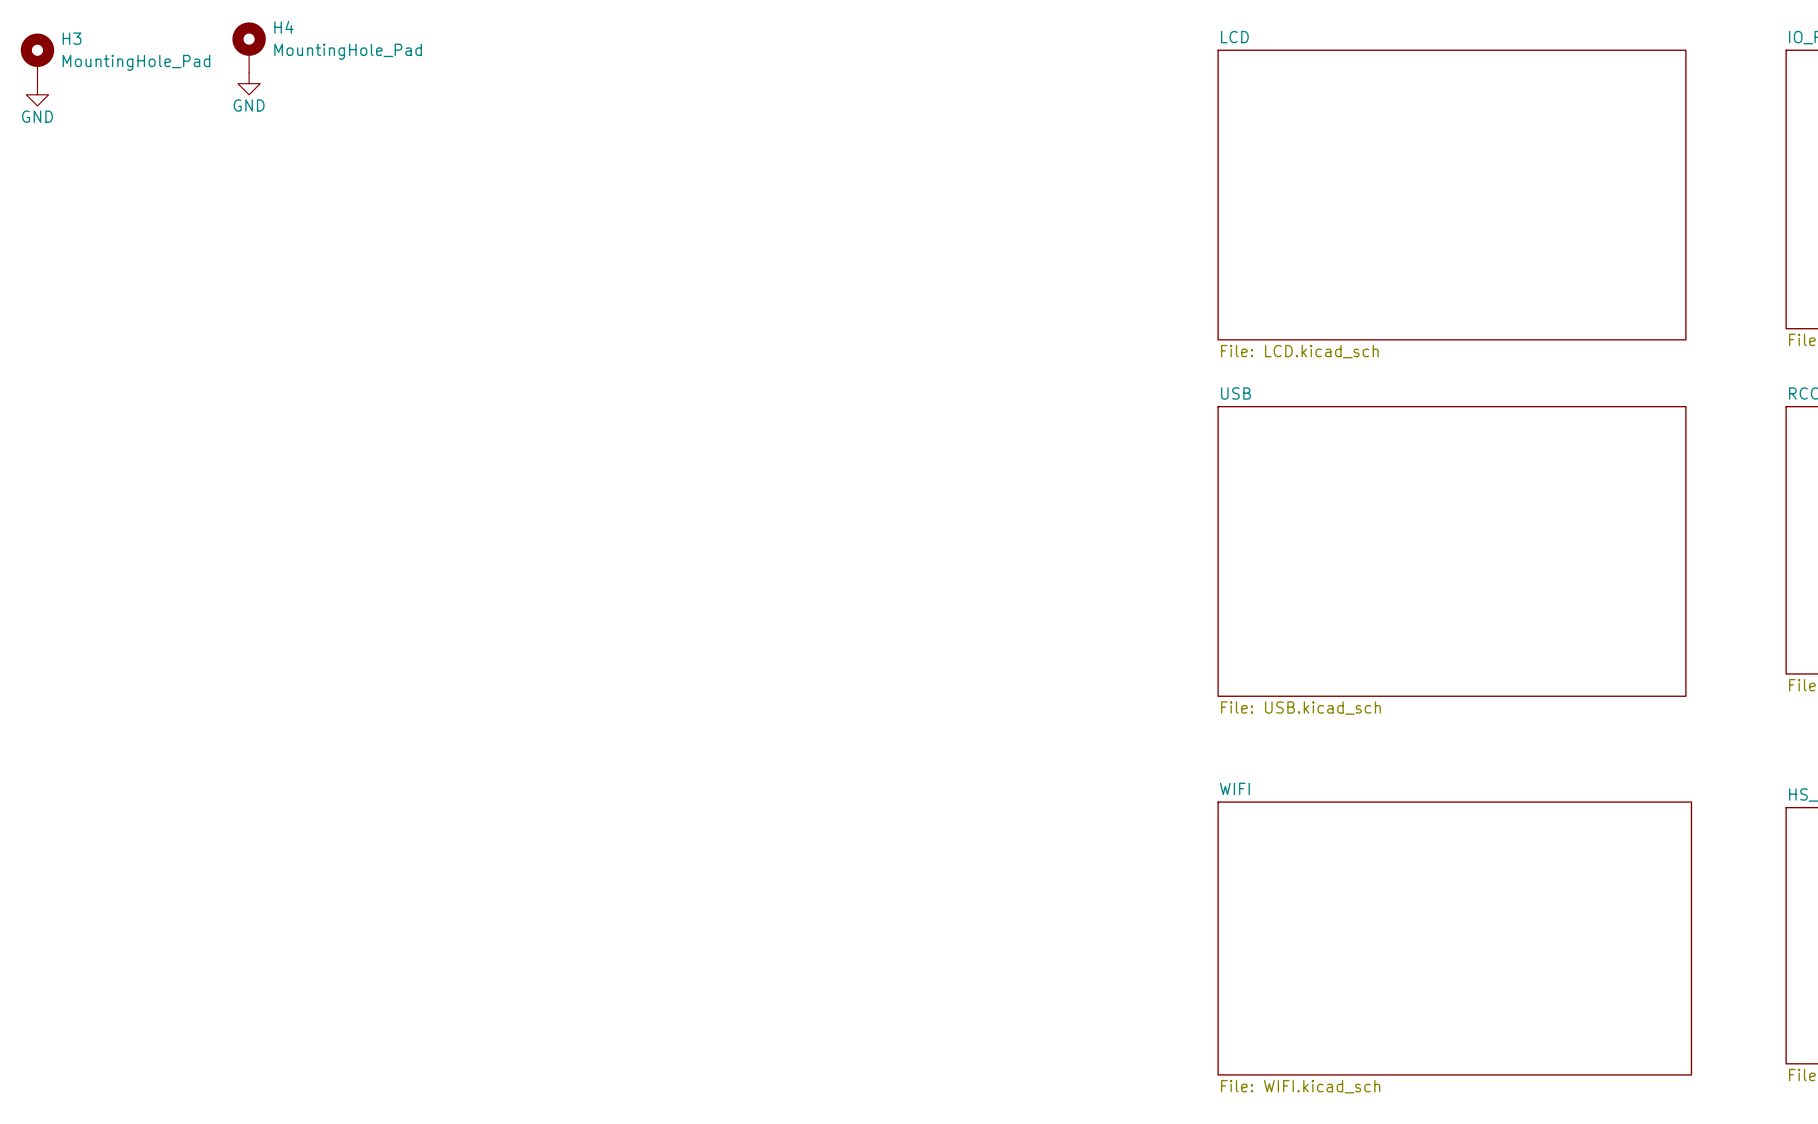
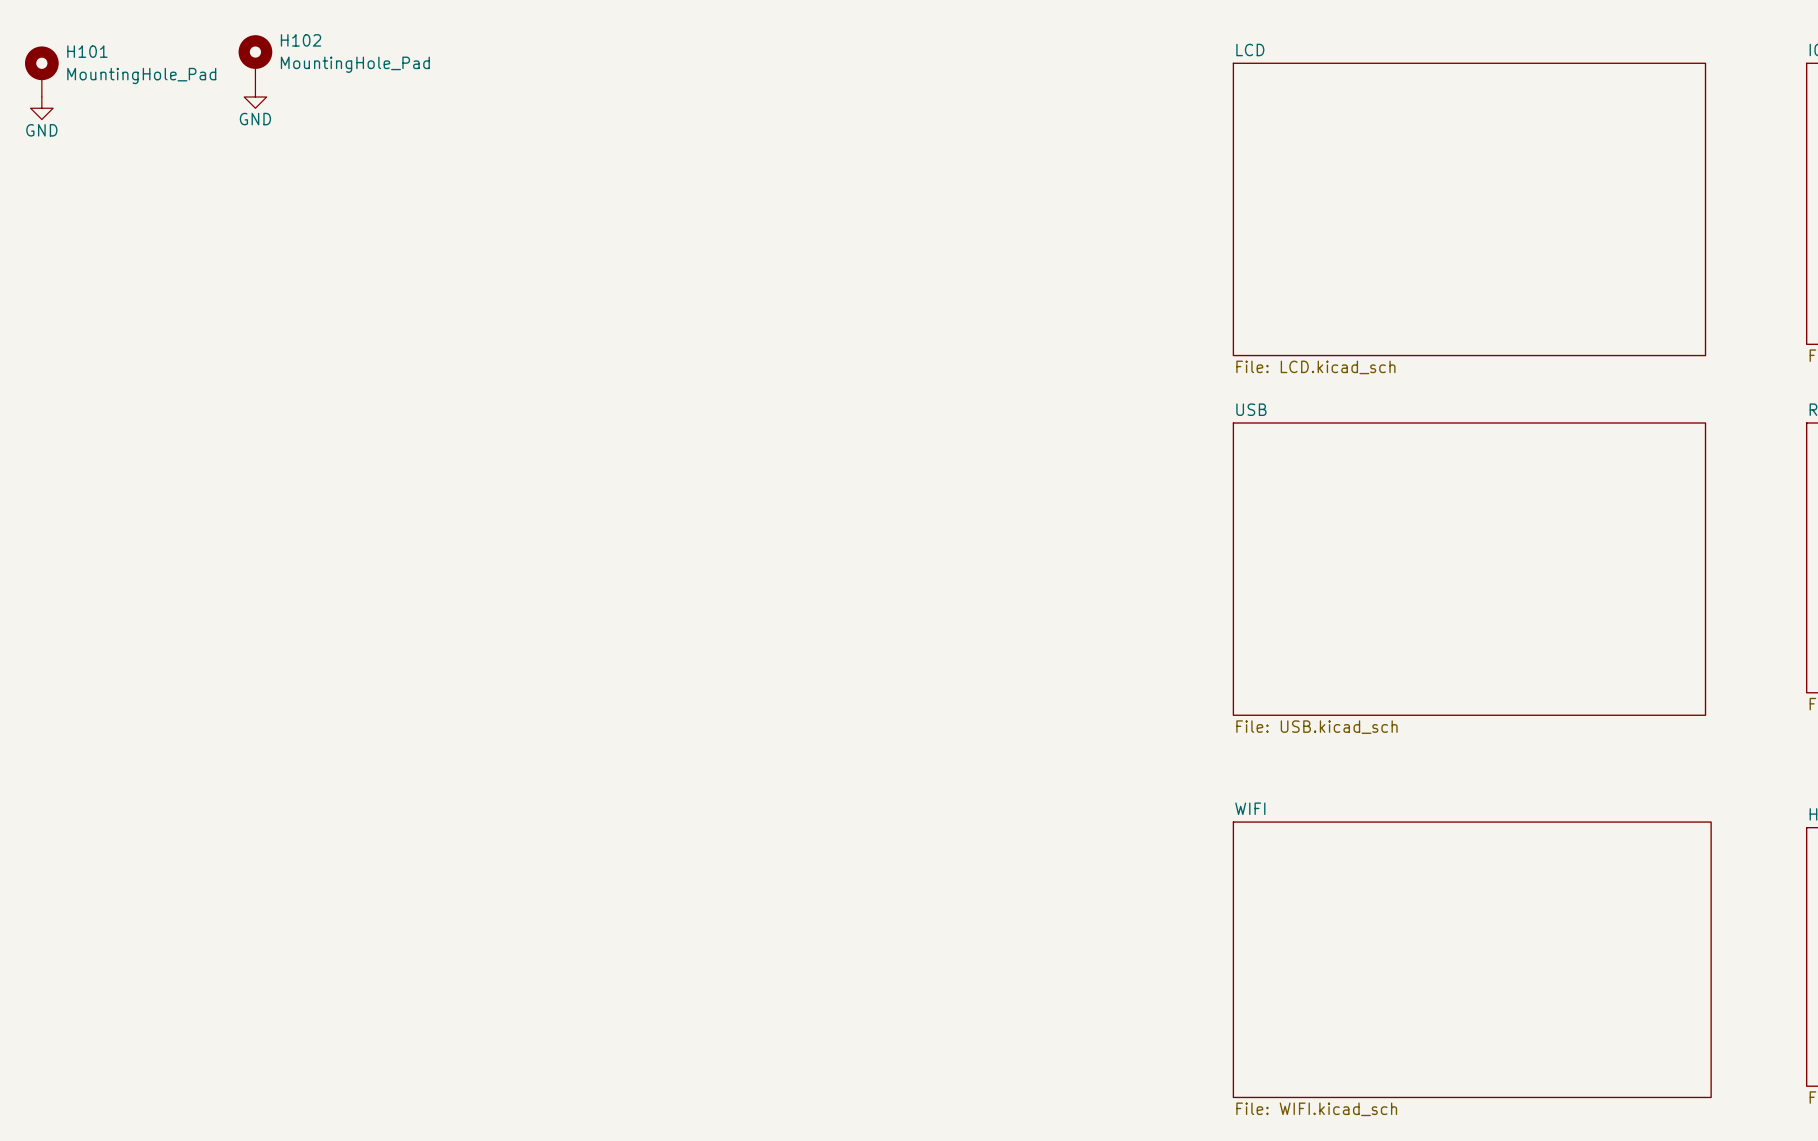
H4 name: H4 (283, 27) -> H102 (301, 40)
H3 name: H3 (72, 38) -> H101 (87, 51)

